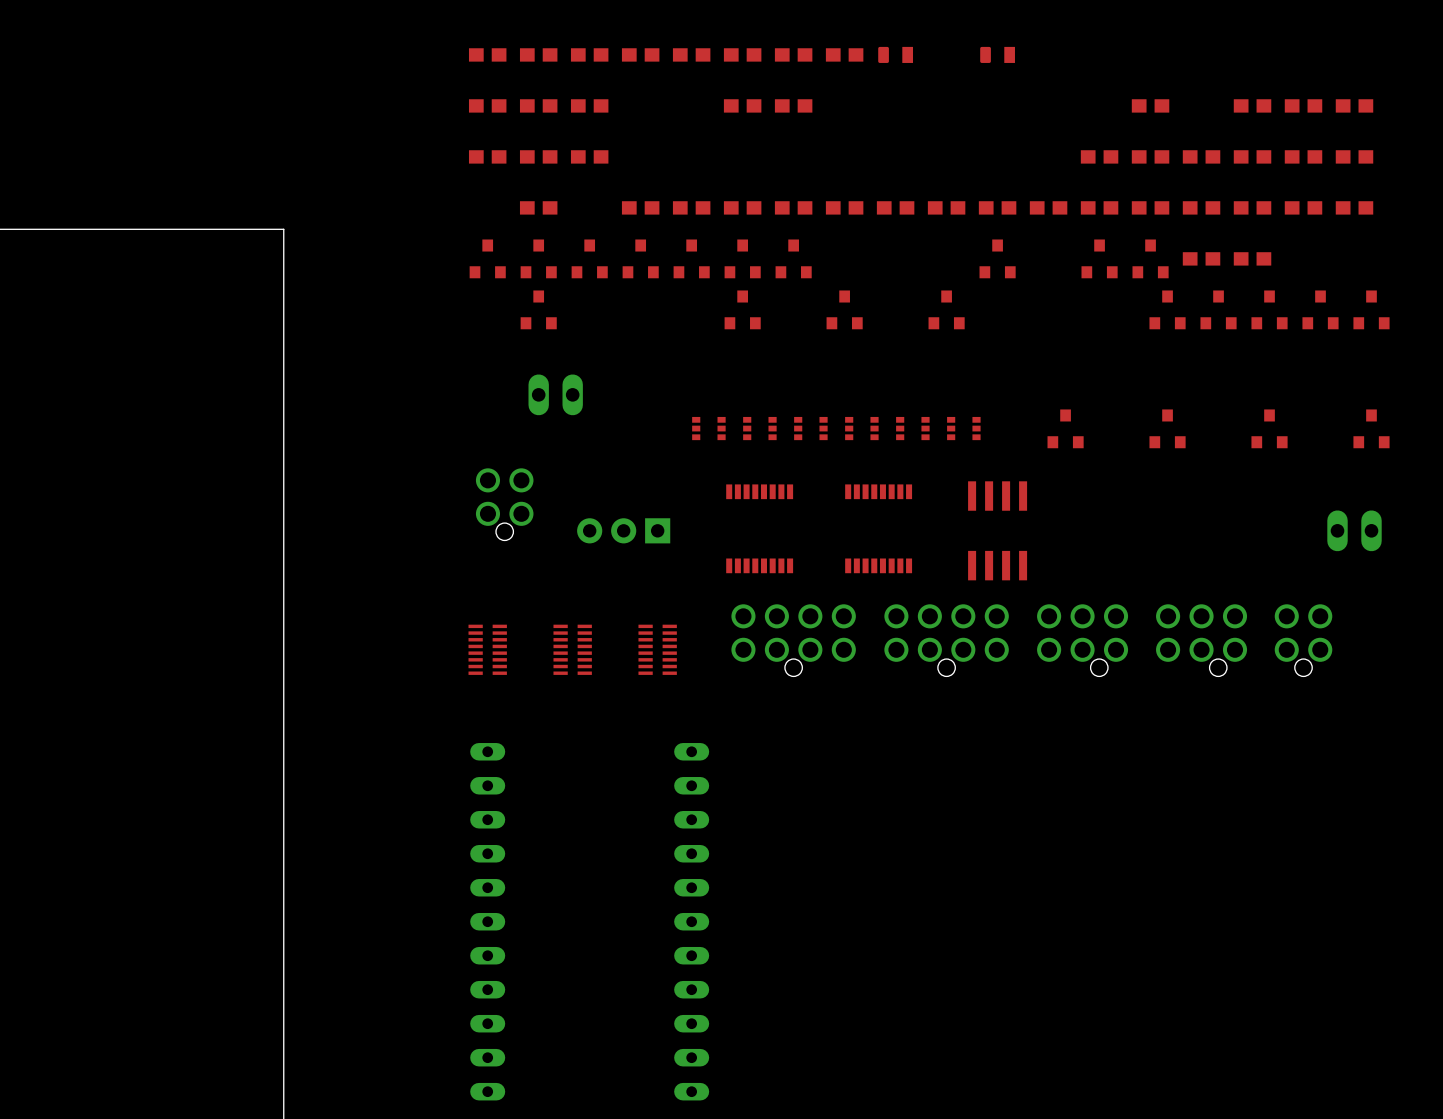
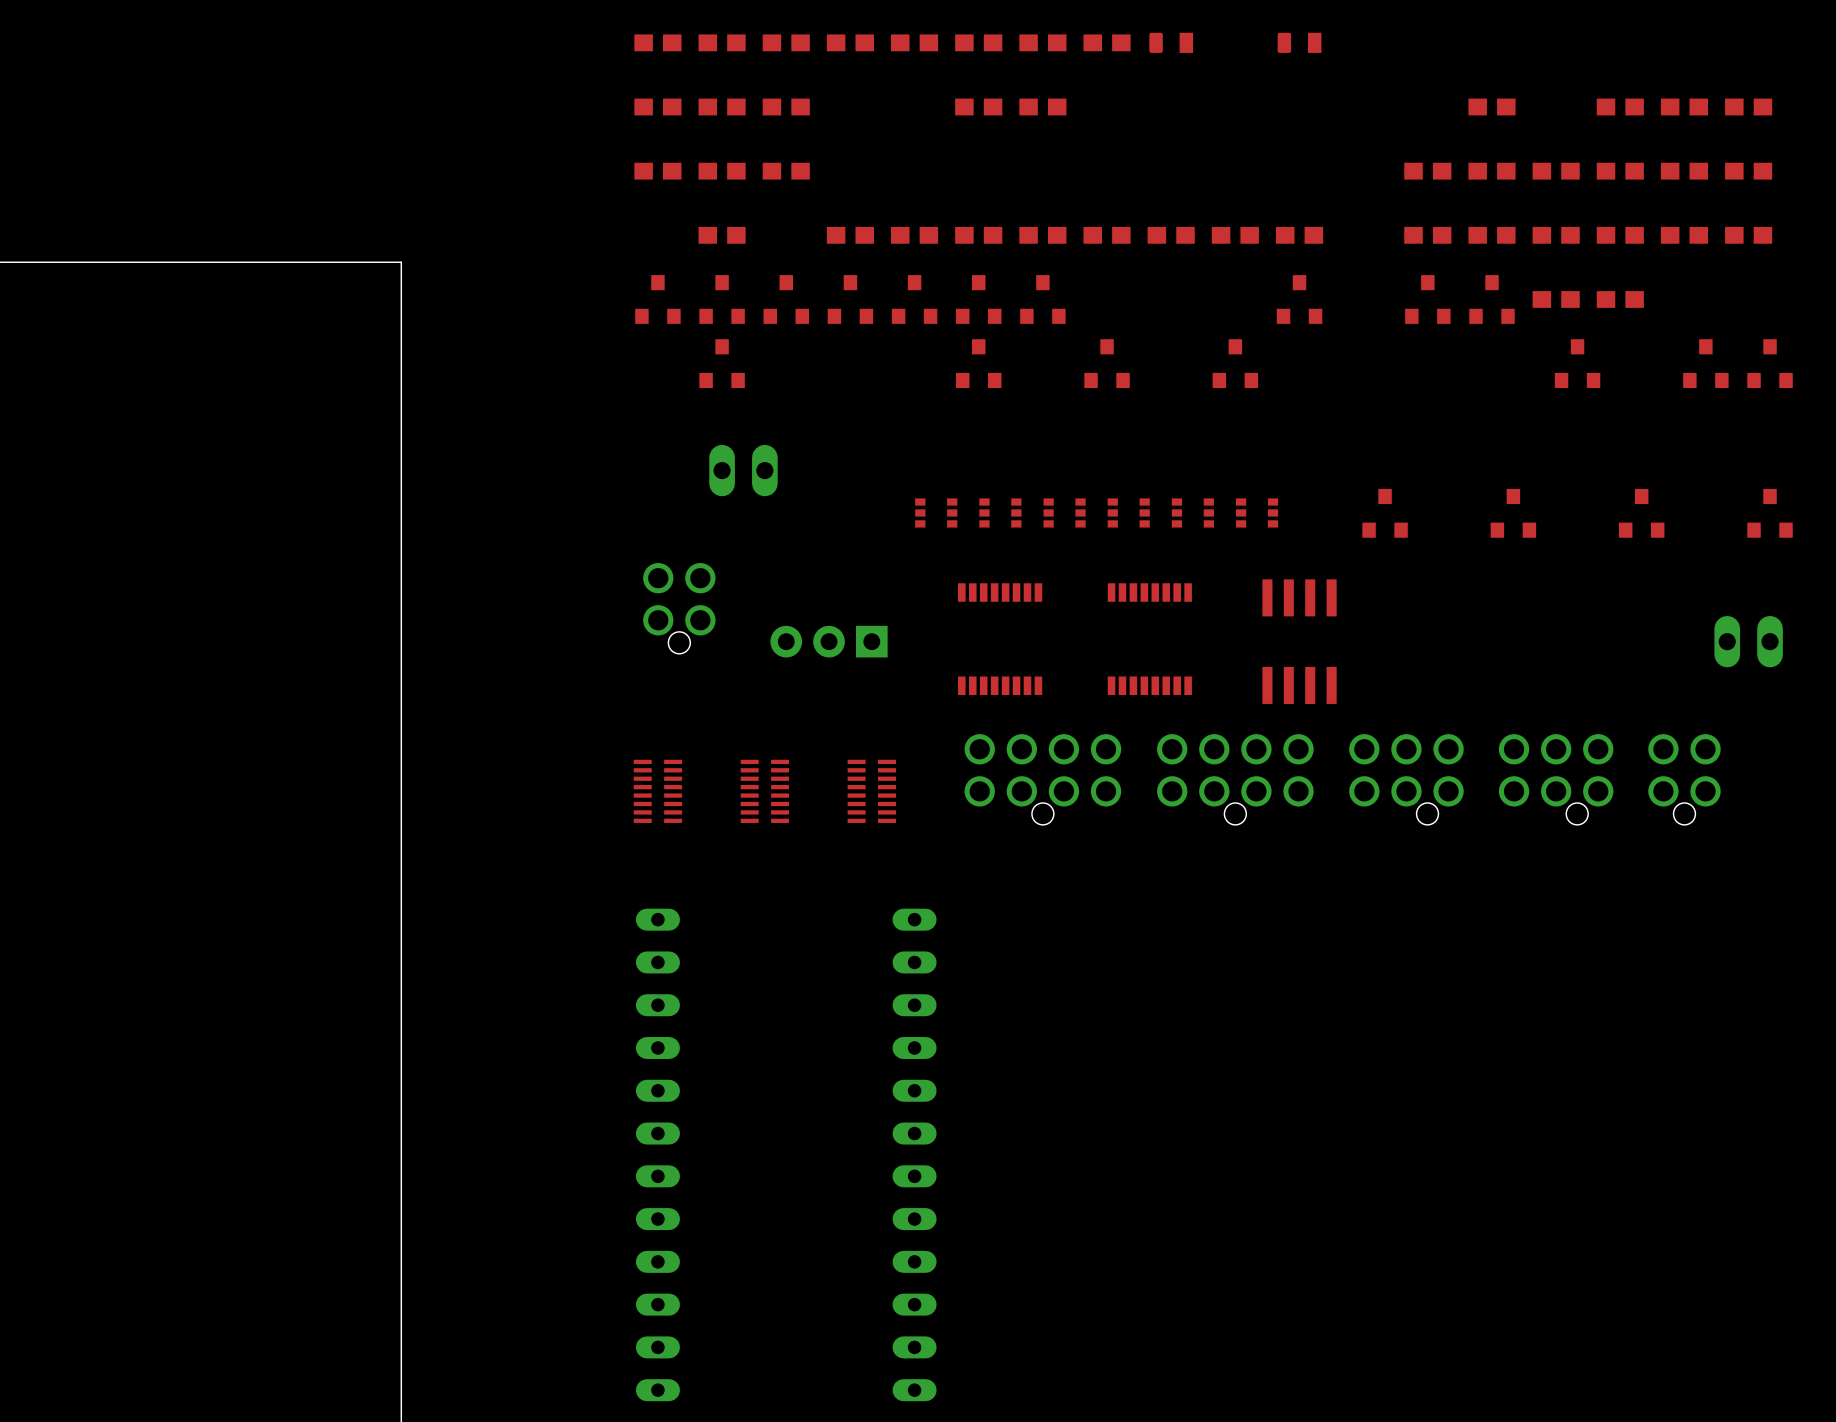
part: (1048, 207) -> none
part: (1167, 309) -> none
part: (1269, 309) -> none

